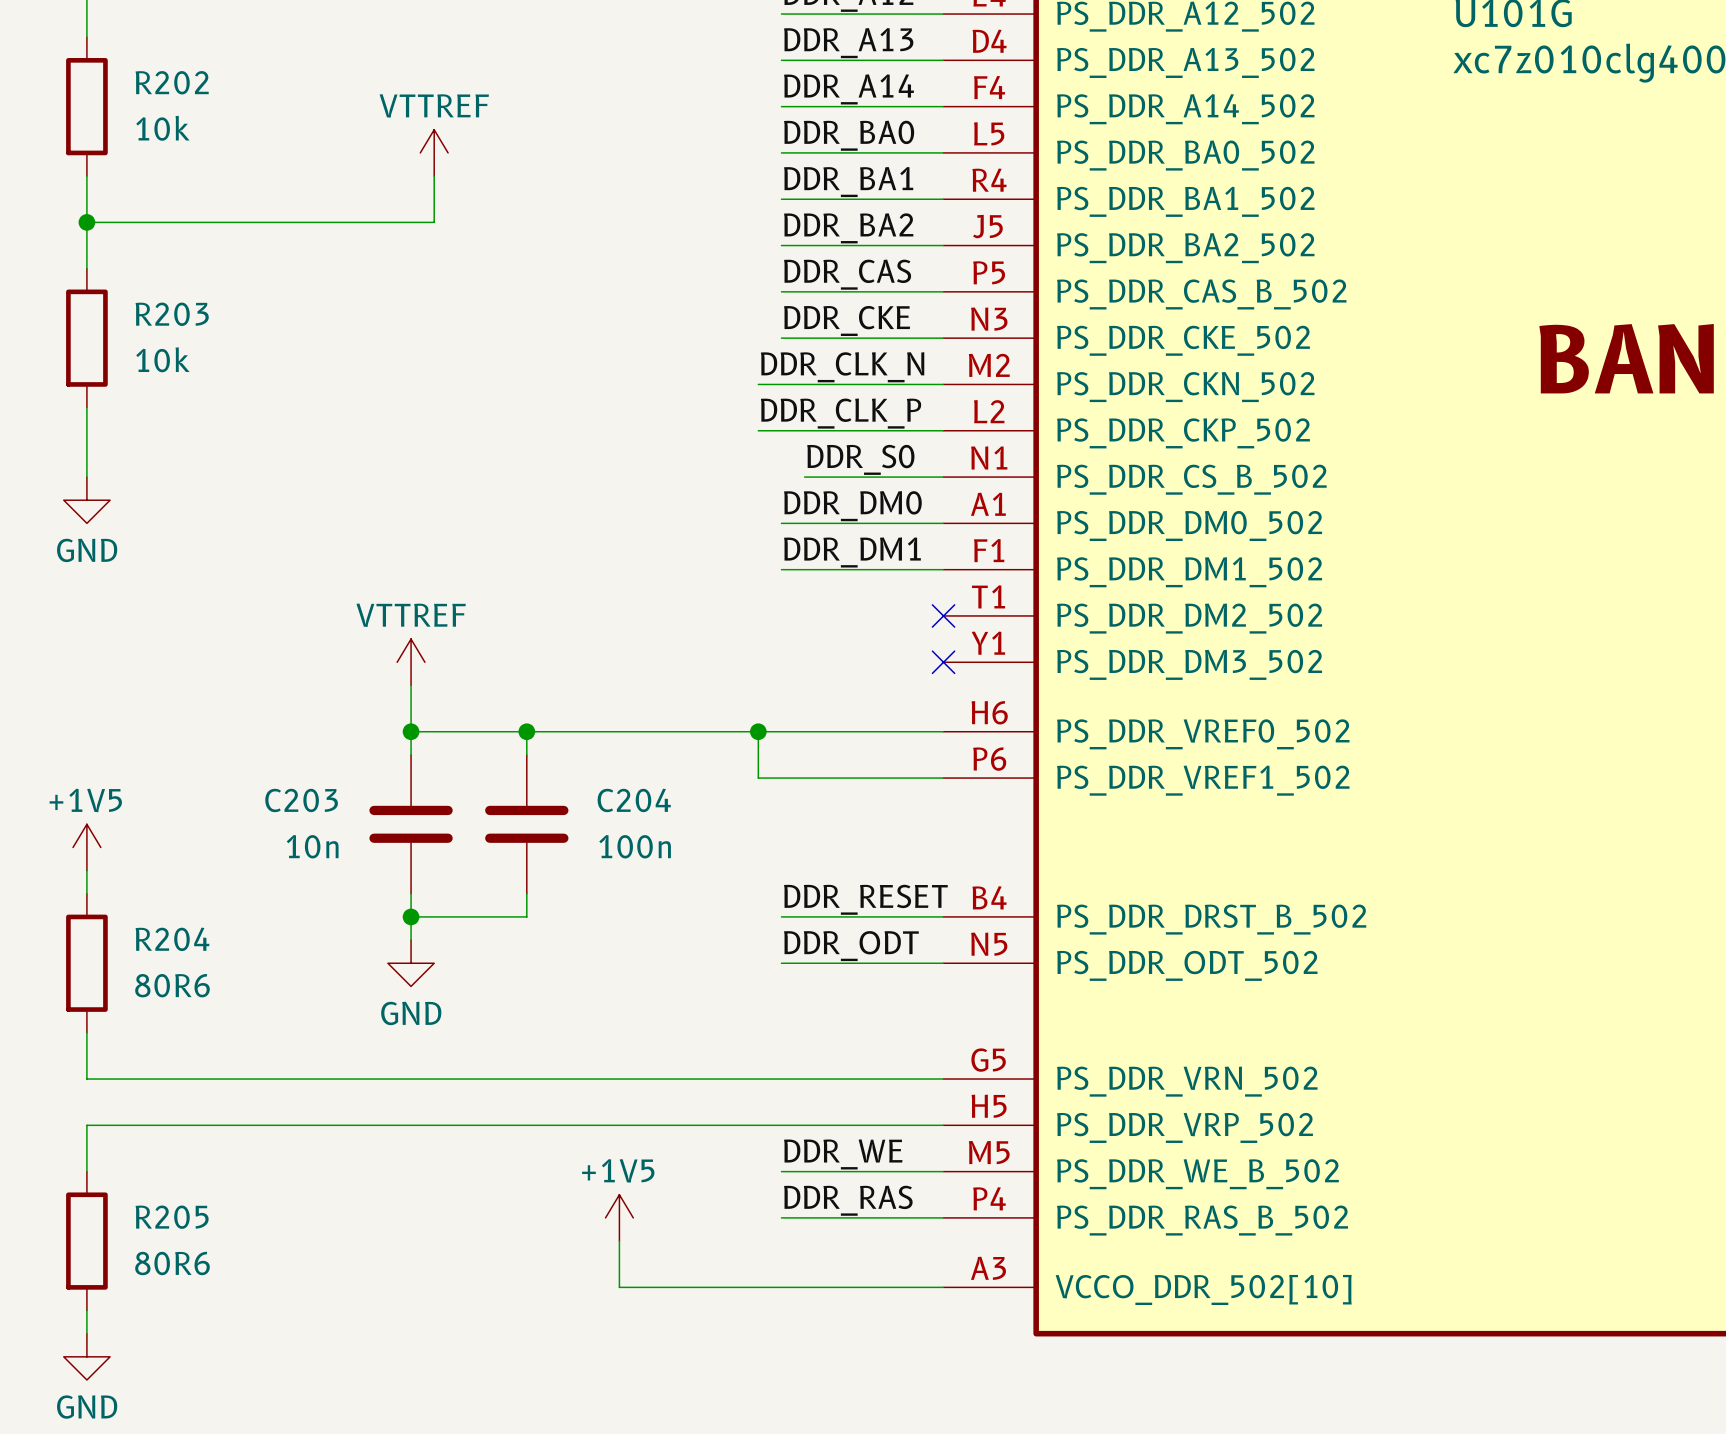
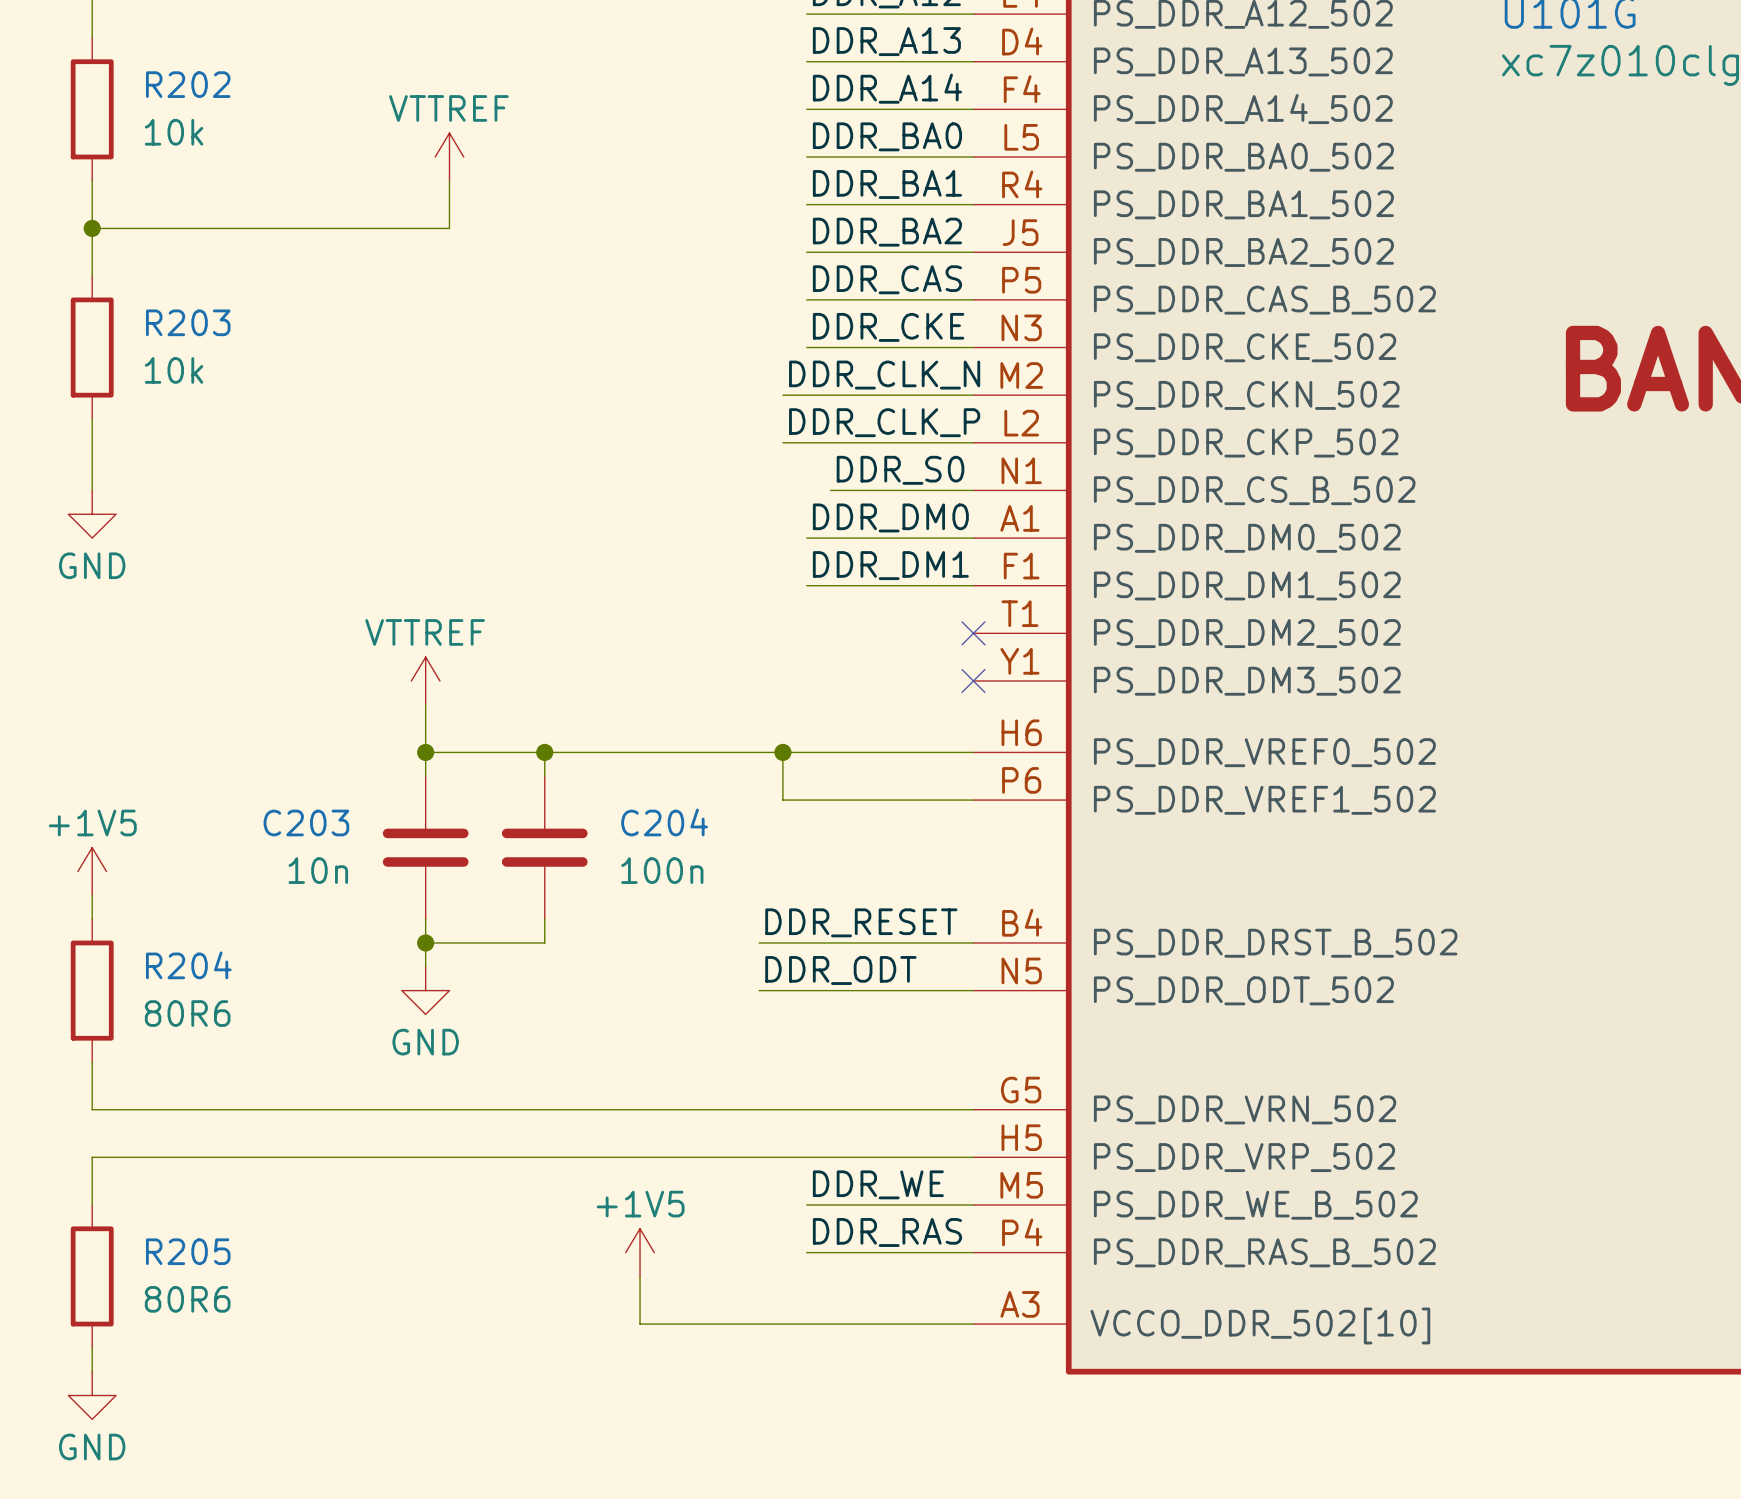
label position: DDR_RESET (865, 899) -> DDR_RESET (861, 922)
wire: none -> (759, 942) (806, 942)
label position: DDR_ODT (851, 946) -> DDR_ODT (840, 970)
wire: none -> (759, 990) (806, 990)

